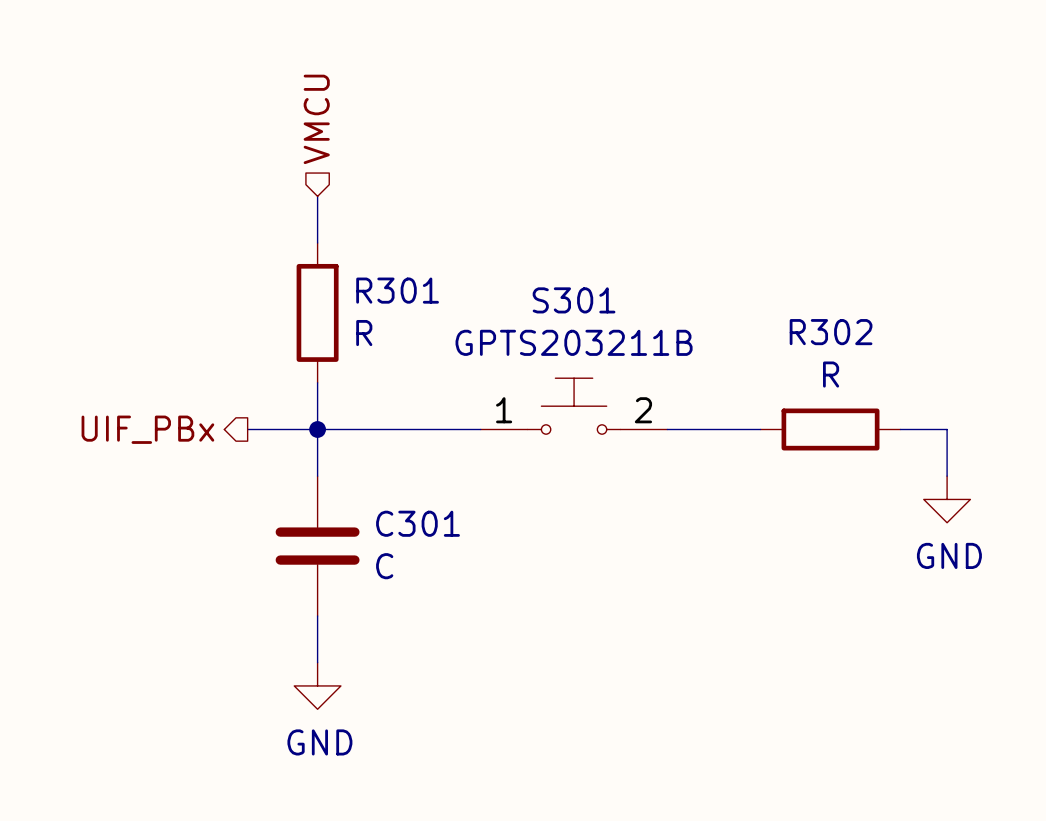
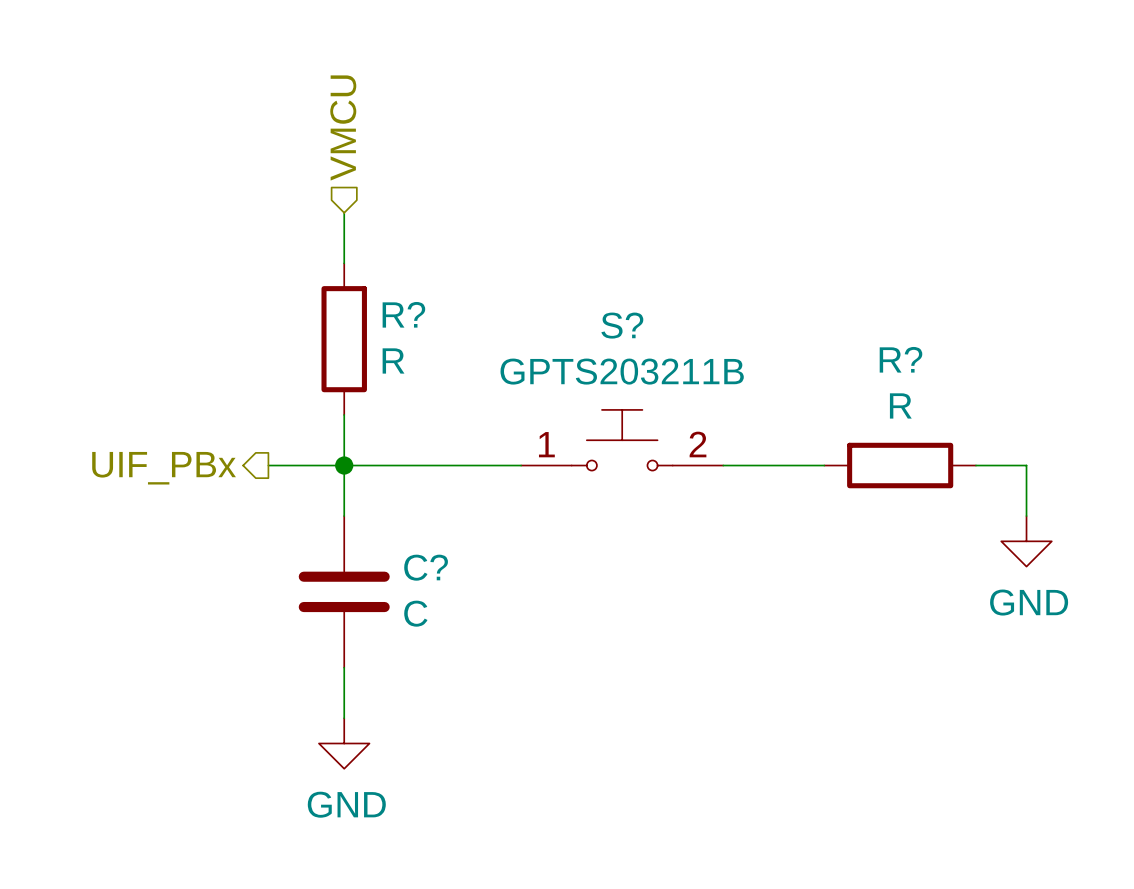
R301 name: R301 (397, 290) -> R? (403, 314)
S301 name: S301 (574, 300) -> S? (622, 325)
R302 name: R302 (831, 332) -> R? (900, 359)
C301 name: C301 (418, 523) -> C? (426, 567)

